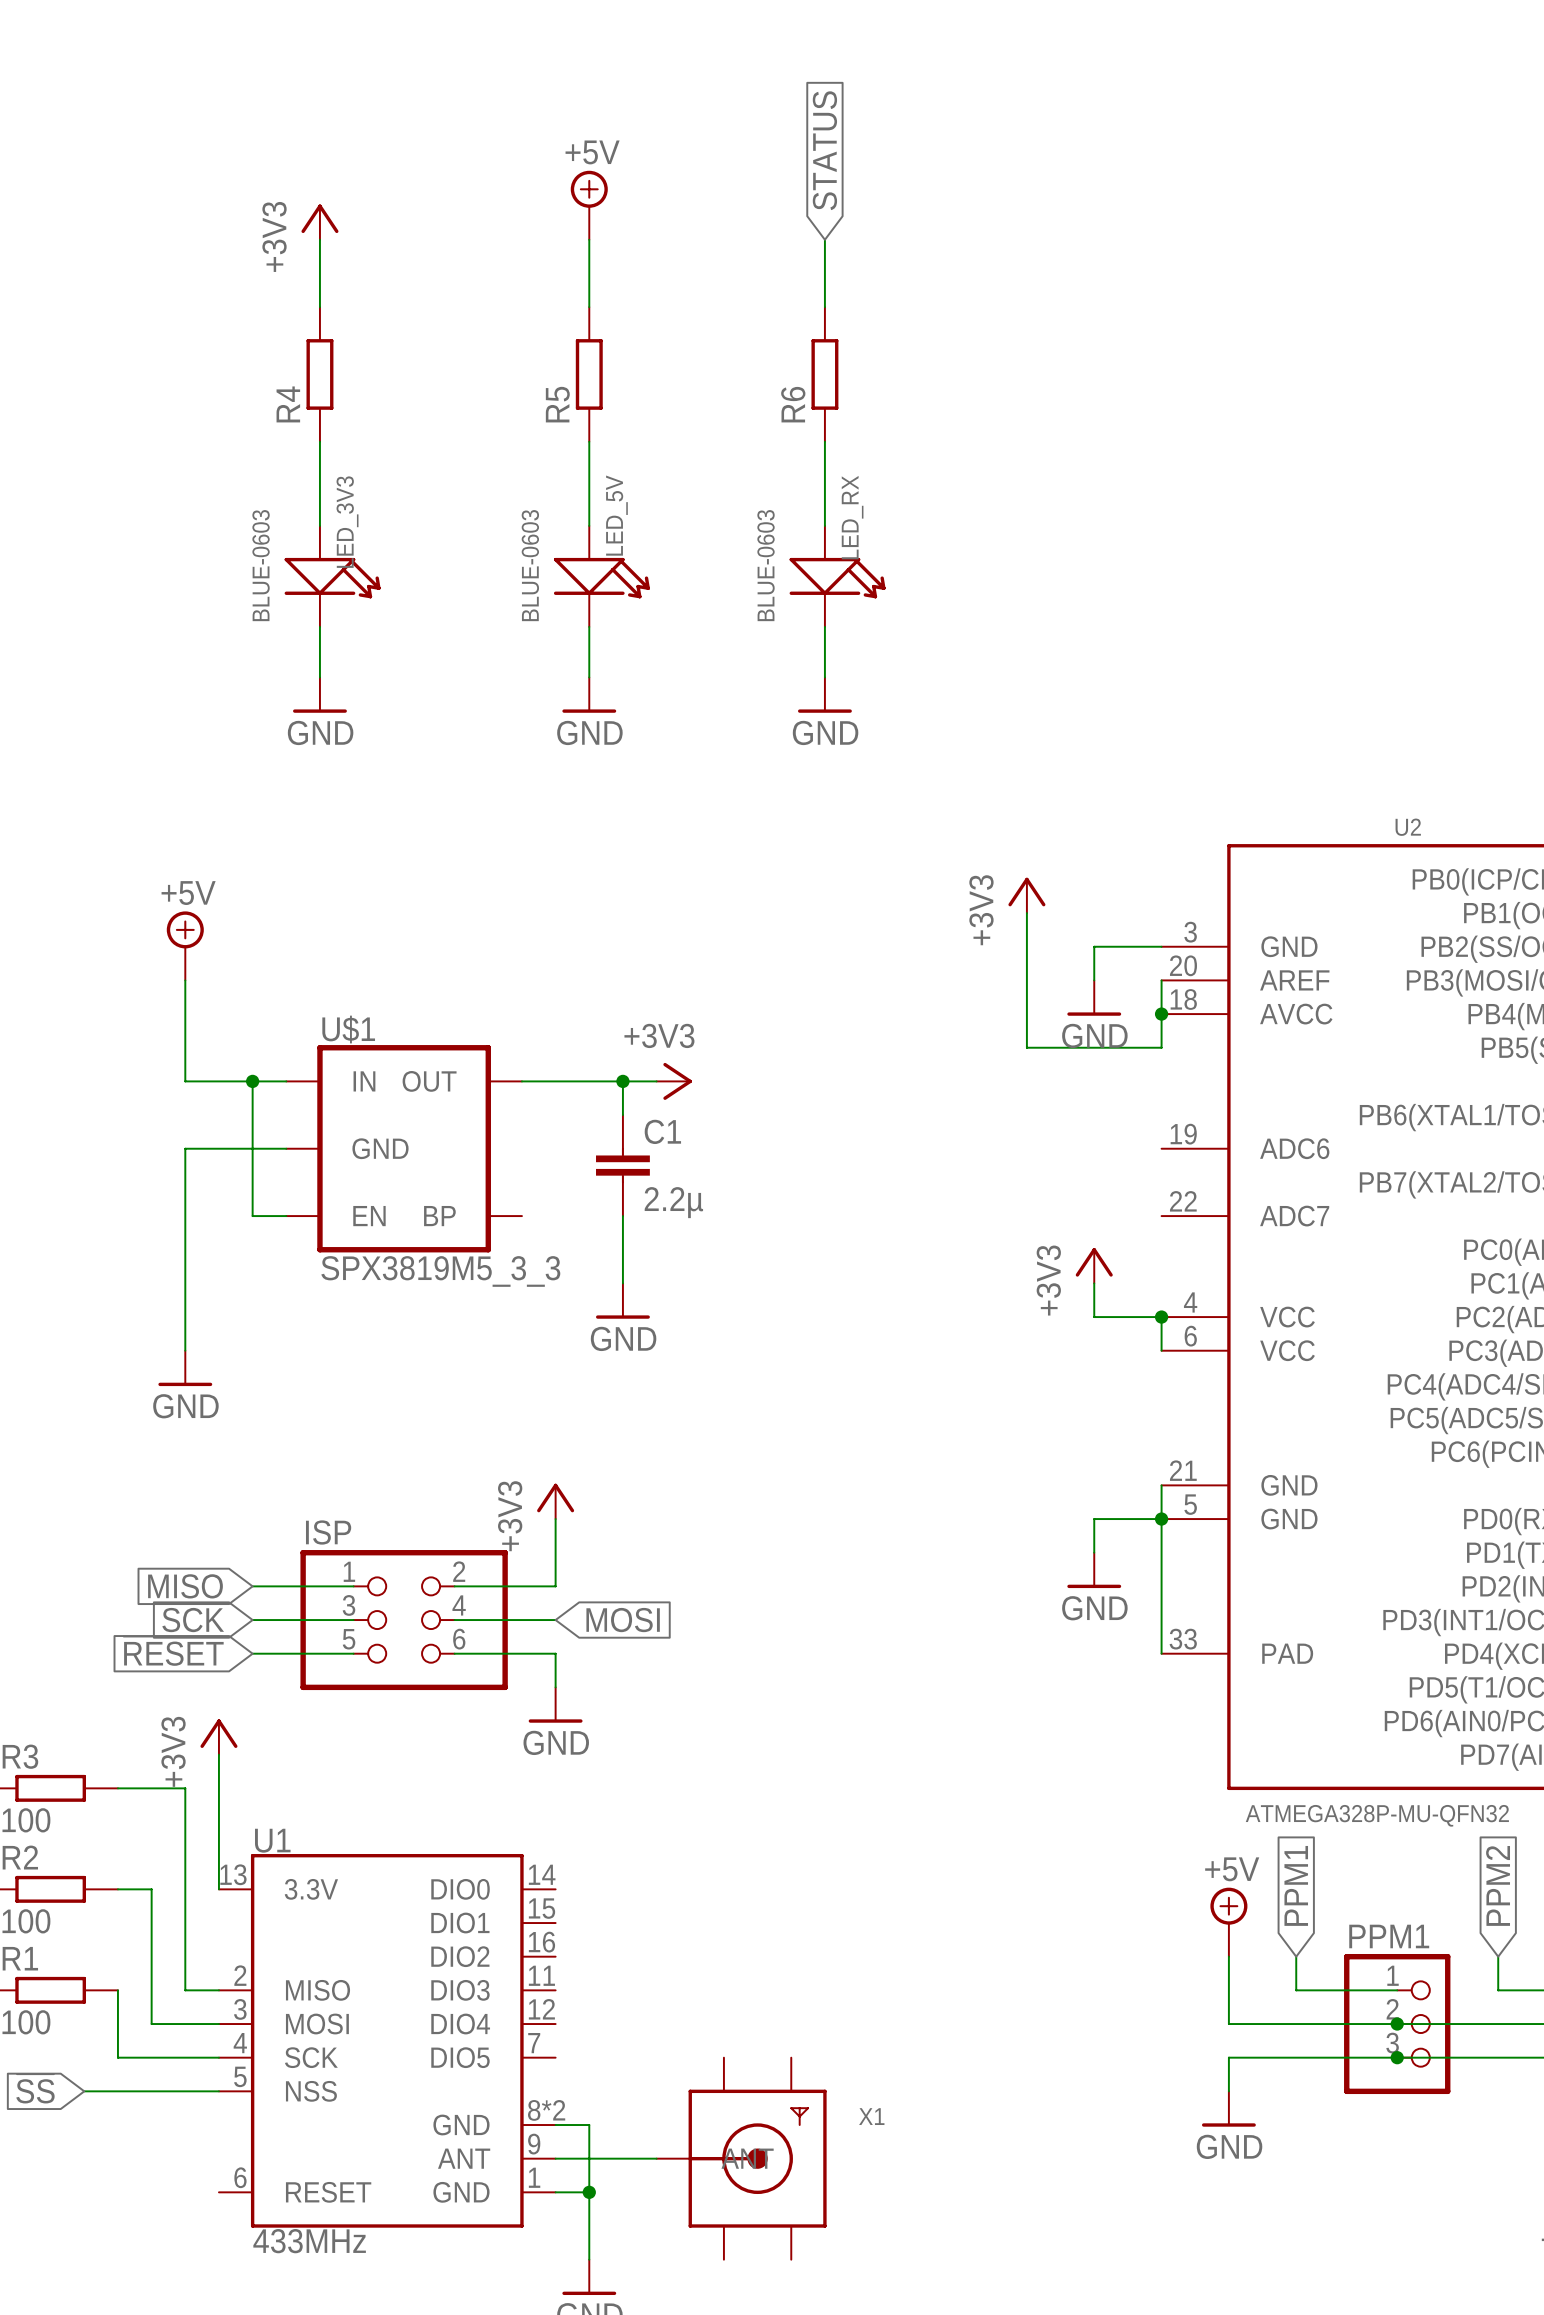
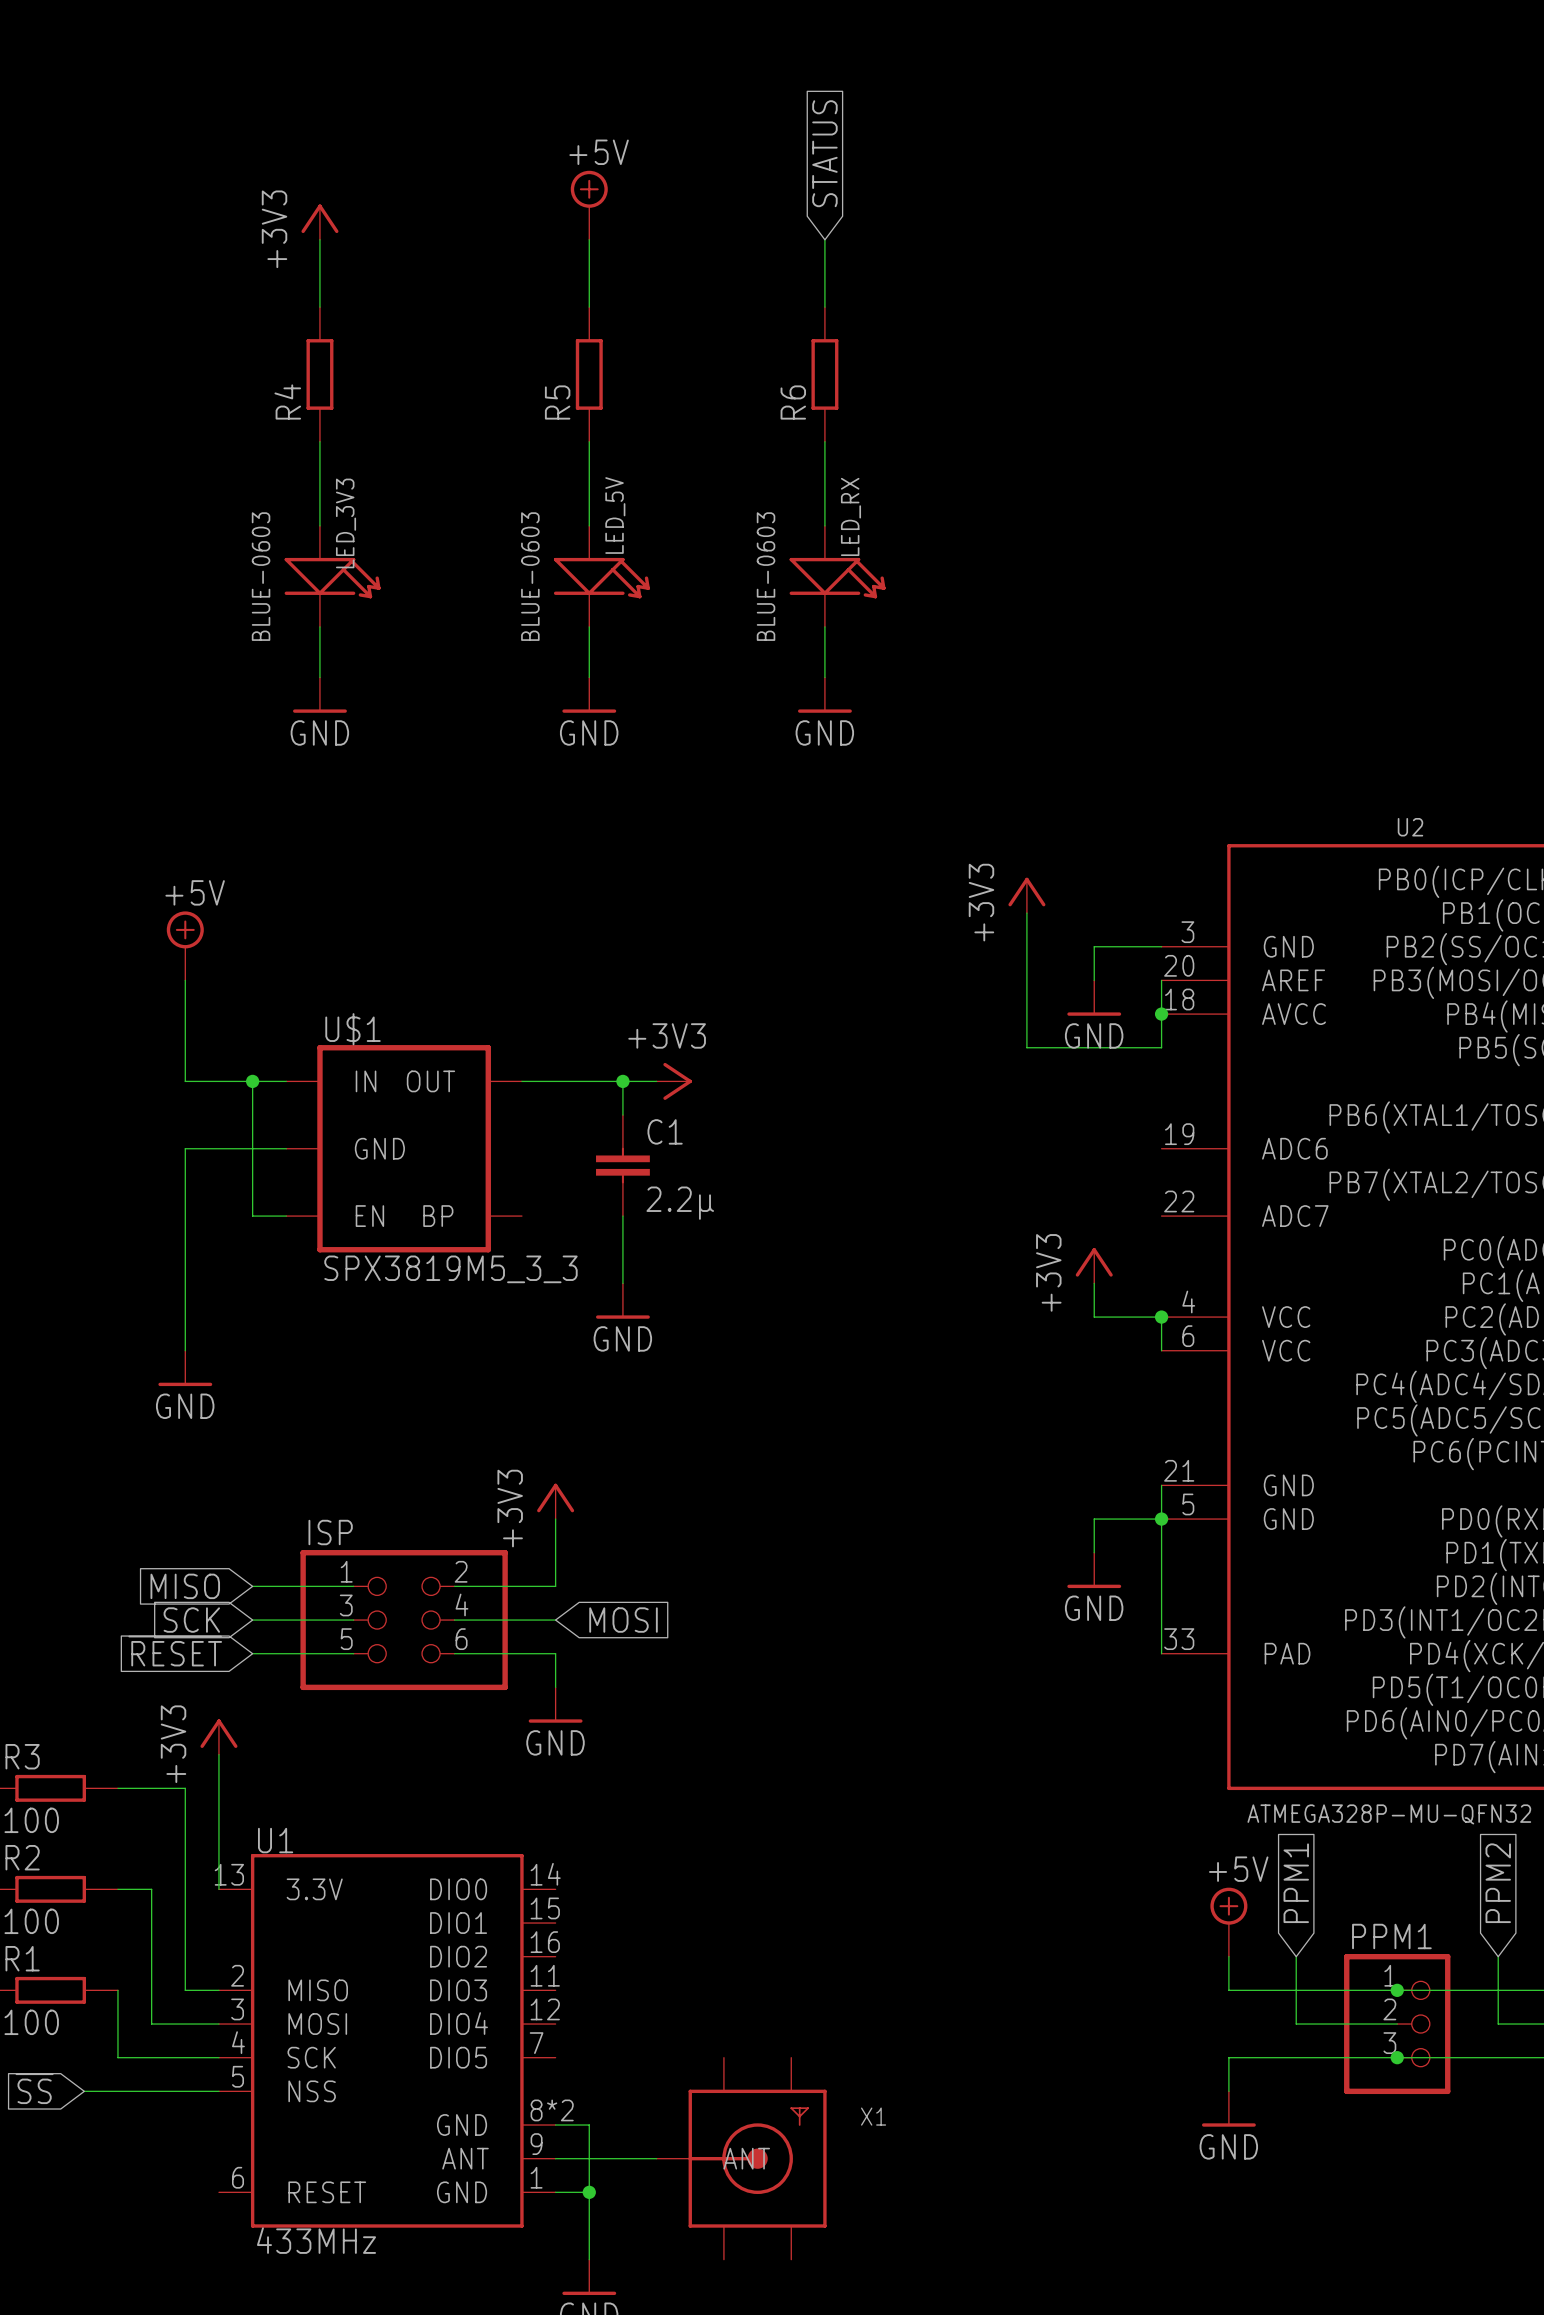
wire: (1228, 1990) (1228, 2024) (1296, 2024) -> (1228, 1990) (1296, 1990) (1296, 2024)
wire: (1397, 2024) (1498, 2024) -> (1397, 1990) (1498, 1990) (1498, 2024)
junction position: (1397, 2024) -> (1397, 1990)

